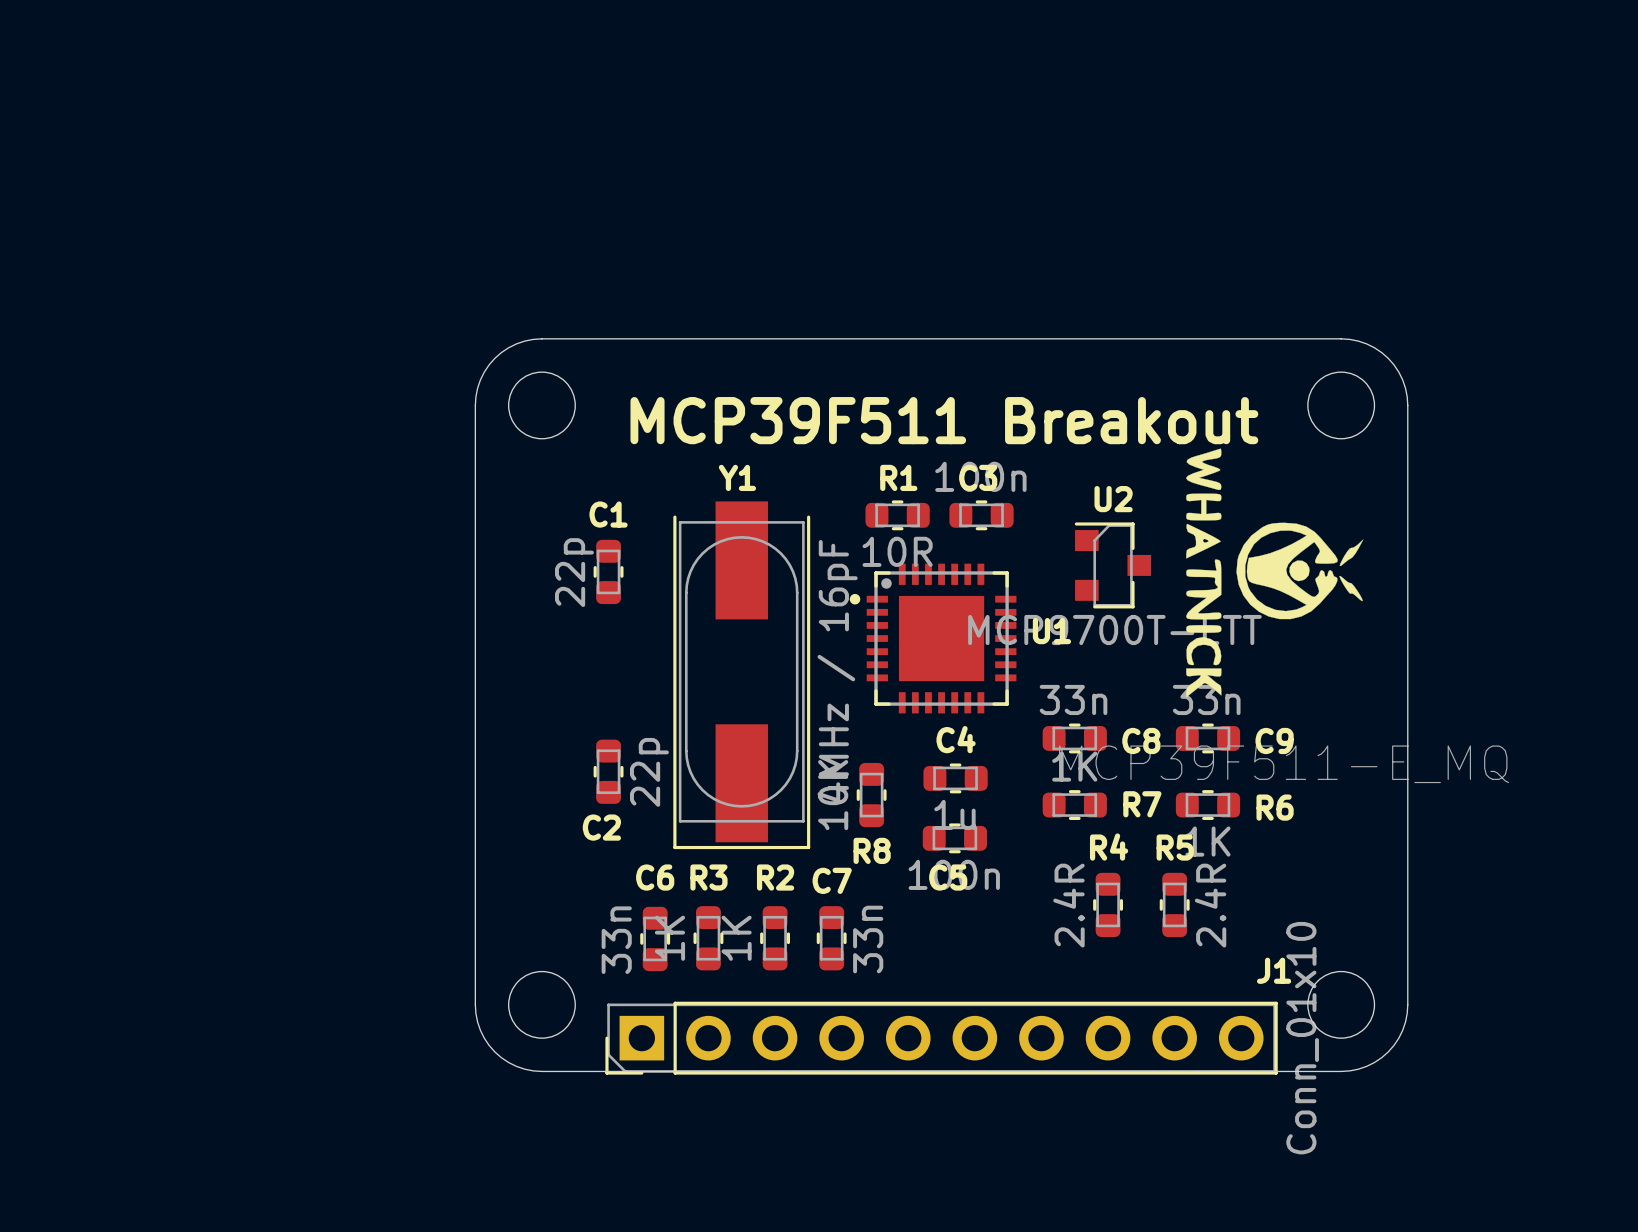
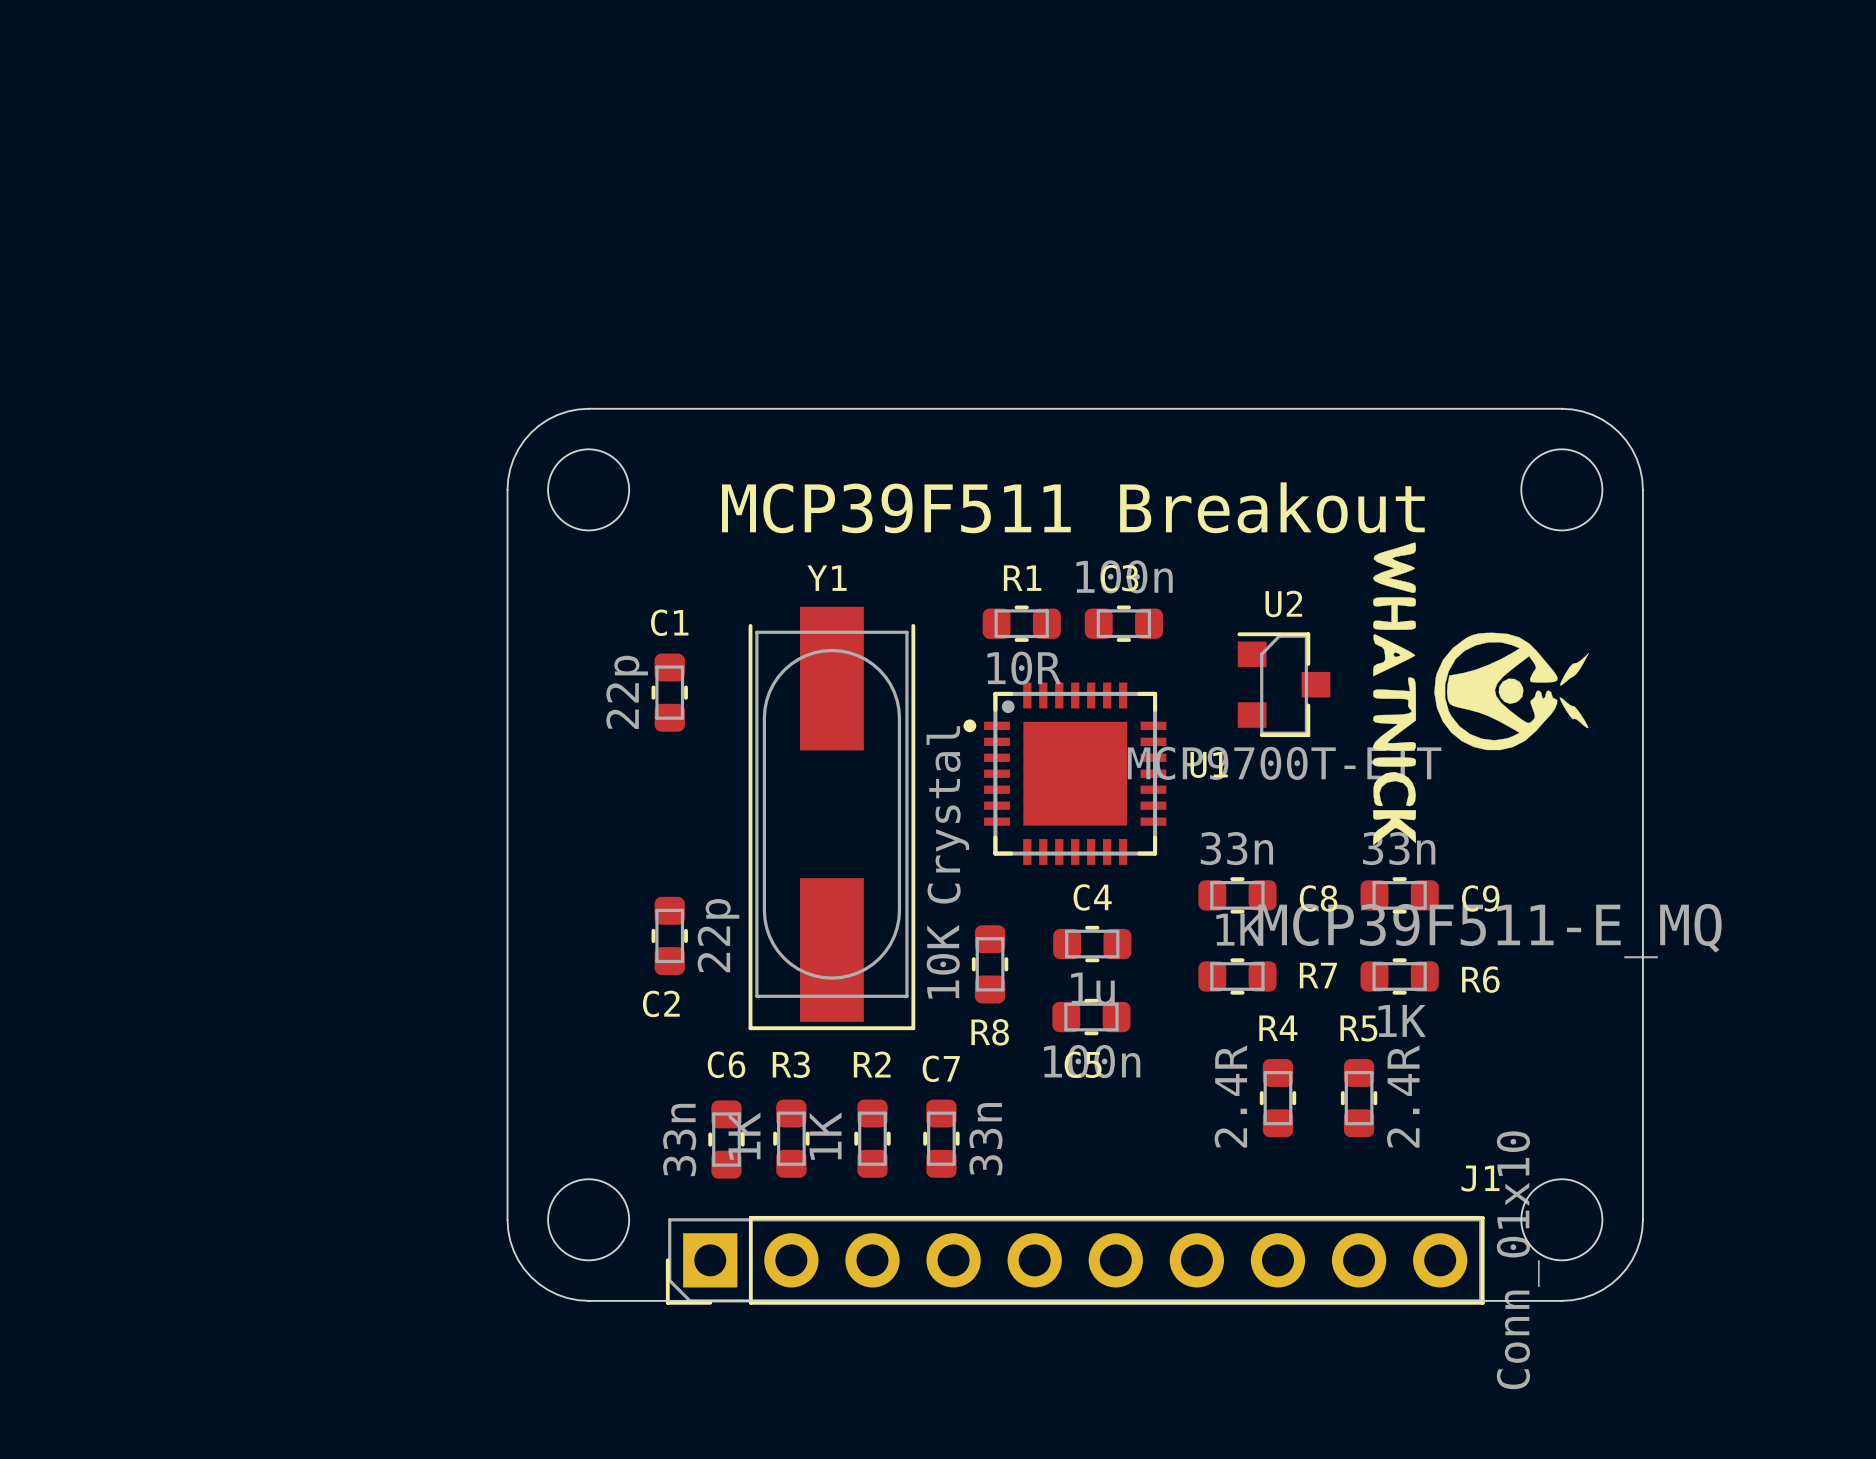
Y1 value: 4MHz / 16pF (837, 671) -> Crystal (947, 814)

